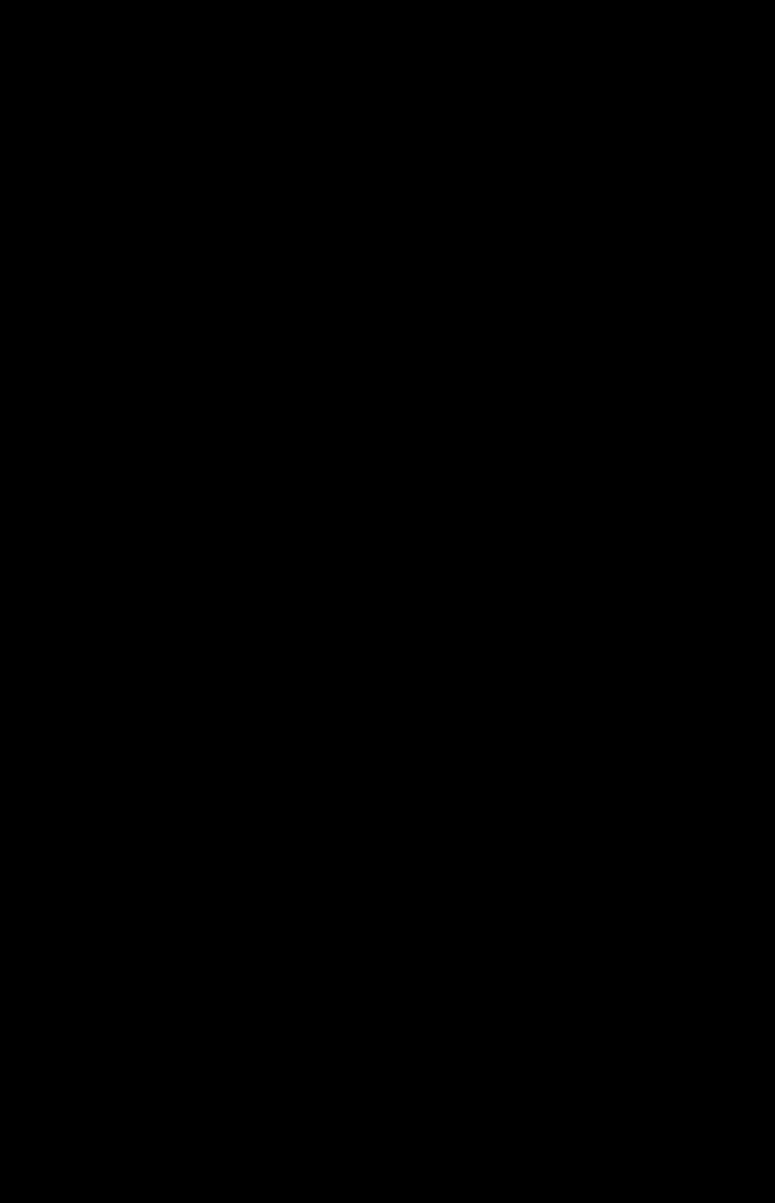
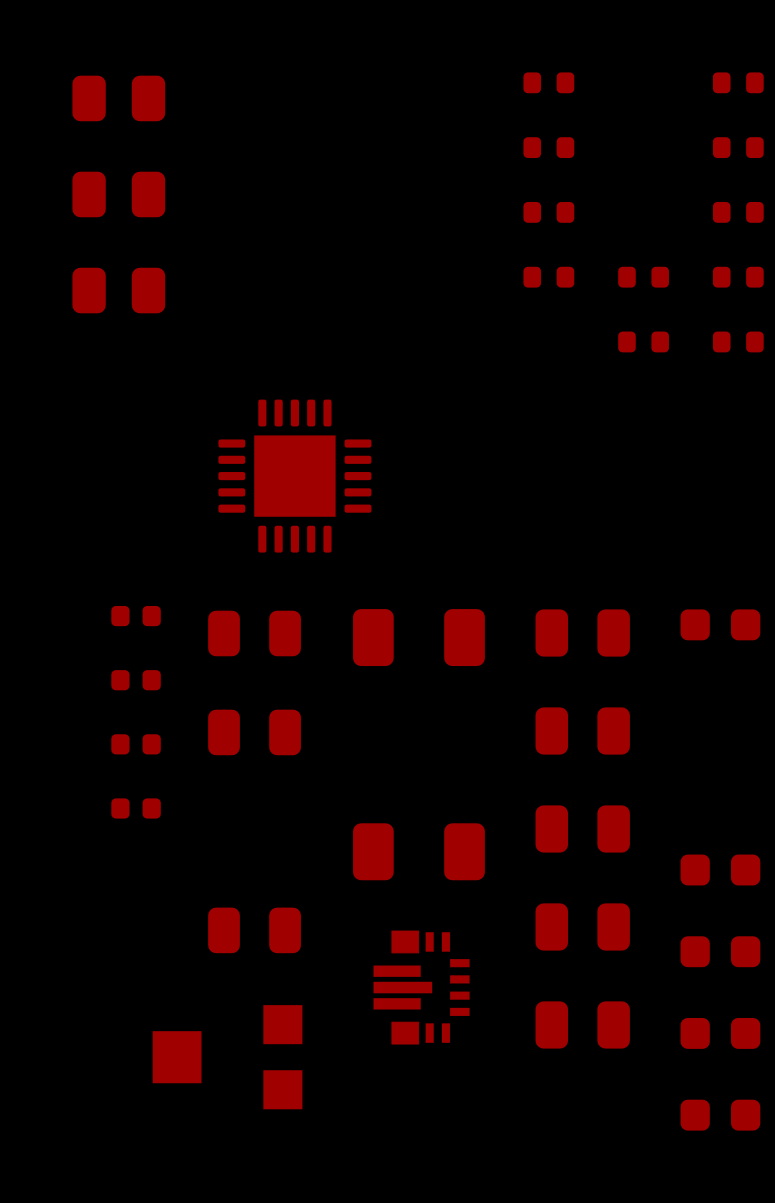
part: none -> (548, 82)
part: none -> (738, 82)
part: none -> (118, 98)
part: none -> (548, 147)
part: none -> (738, 147)
part: none -> (118, 194)
part: none -> (548, 212)
part: none -> (738, 212)
part: none -> (548, 277)
part: none -> (643, 277)
part: none -> (738, 277)
part: none -> (118, 290)
part: none -> (643, 341)
part: none -> (738, 341)
part: none -> (294, 476)
part: none -> (136, 616)
part: none -> (720, 624)
part: none -> (254, 633)
part: none -> (582, 633)
part: none -> (418, 637)
part: none -> (136, 680)
part: none -> (582, 731)
part: none -> (254, 732)
part: none -> (136, 744)
part: none -> (136, 808)
part: none -> (582, 828)
part: none -> (418, 851)
part: none -> (720, 870)
part: none -> (582, 926)
part: none -> (254, 930)
part: none -> (720, 951)
part: none -> (421, 987)
part: none -> (582, 1024)
part: none -> (720, 1033)
part: none -> (227, 1057)
part: none -> (720, 1115)

